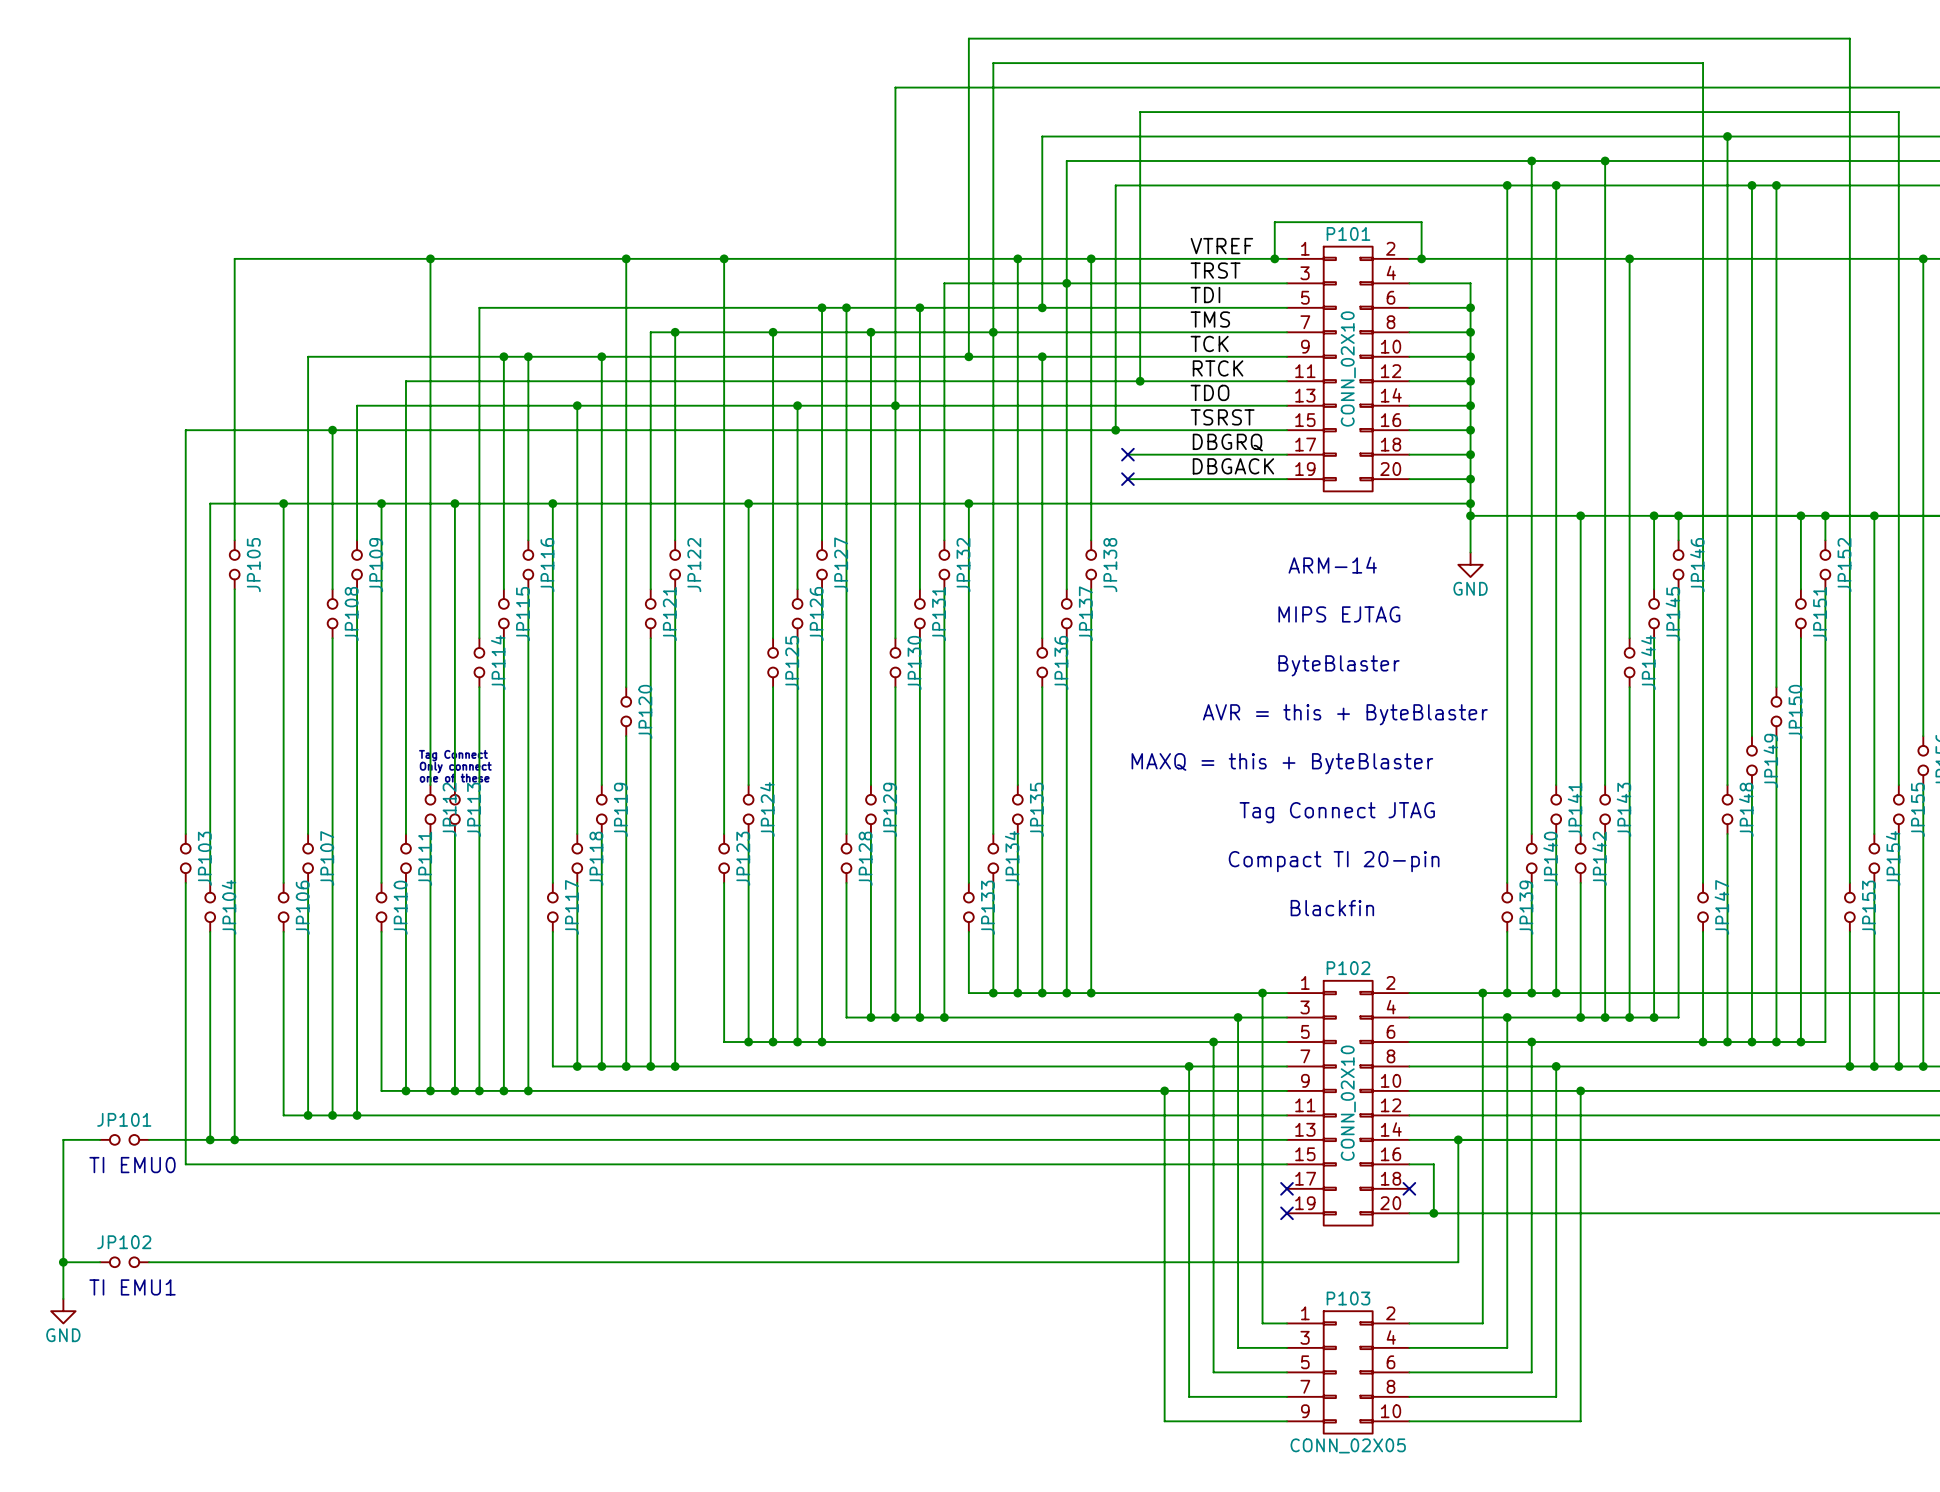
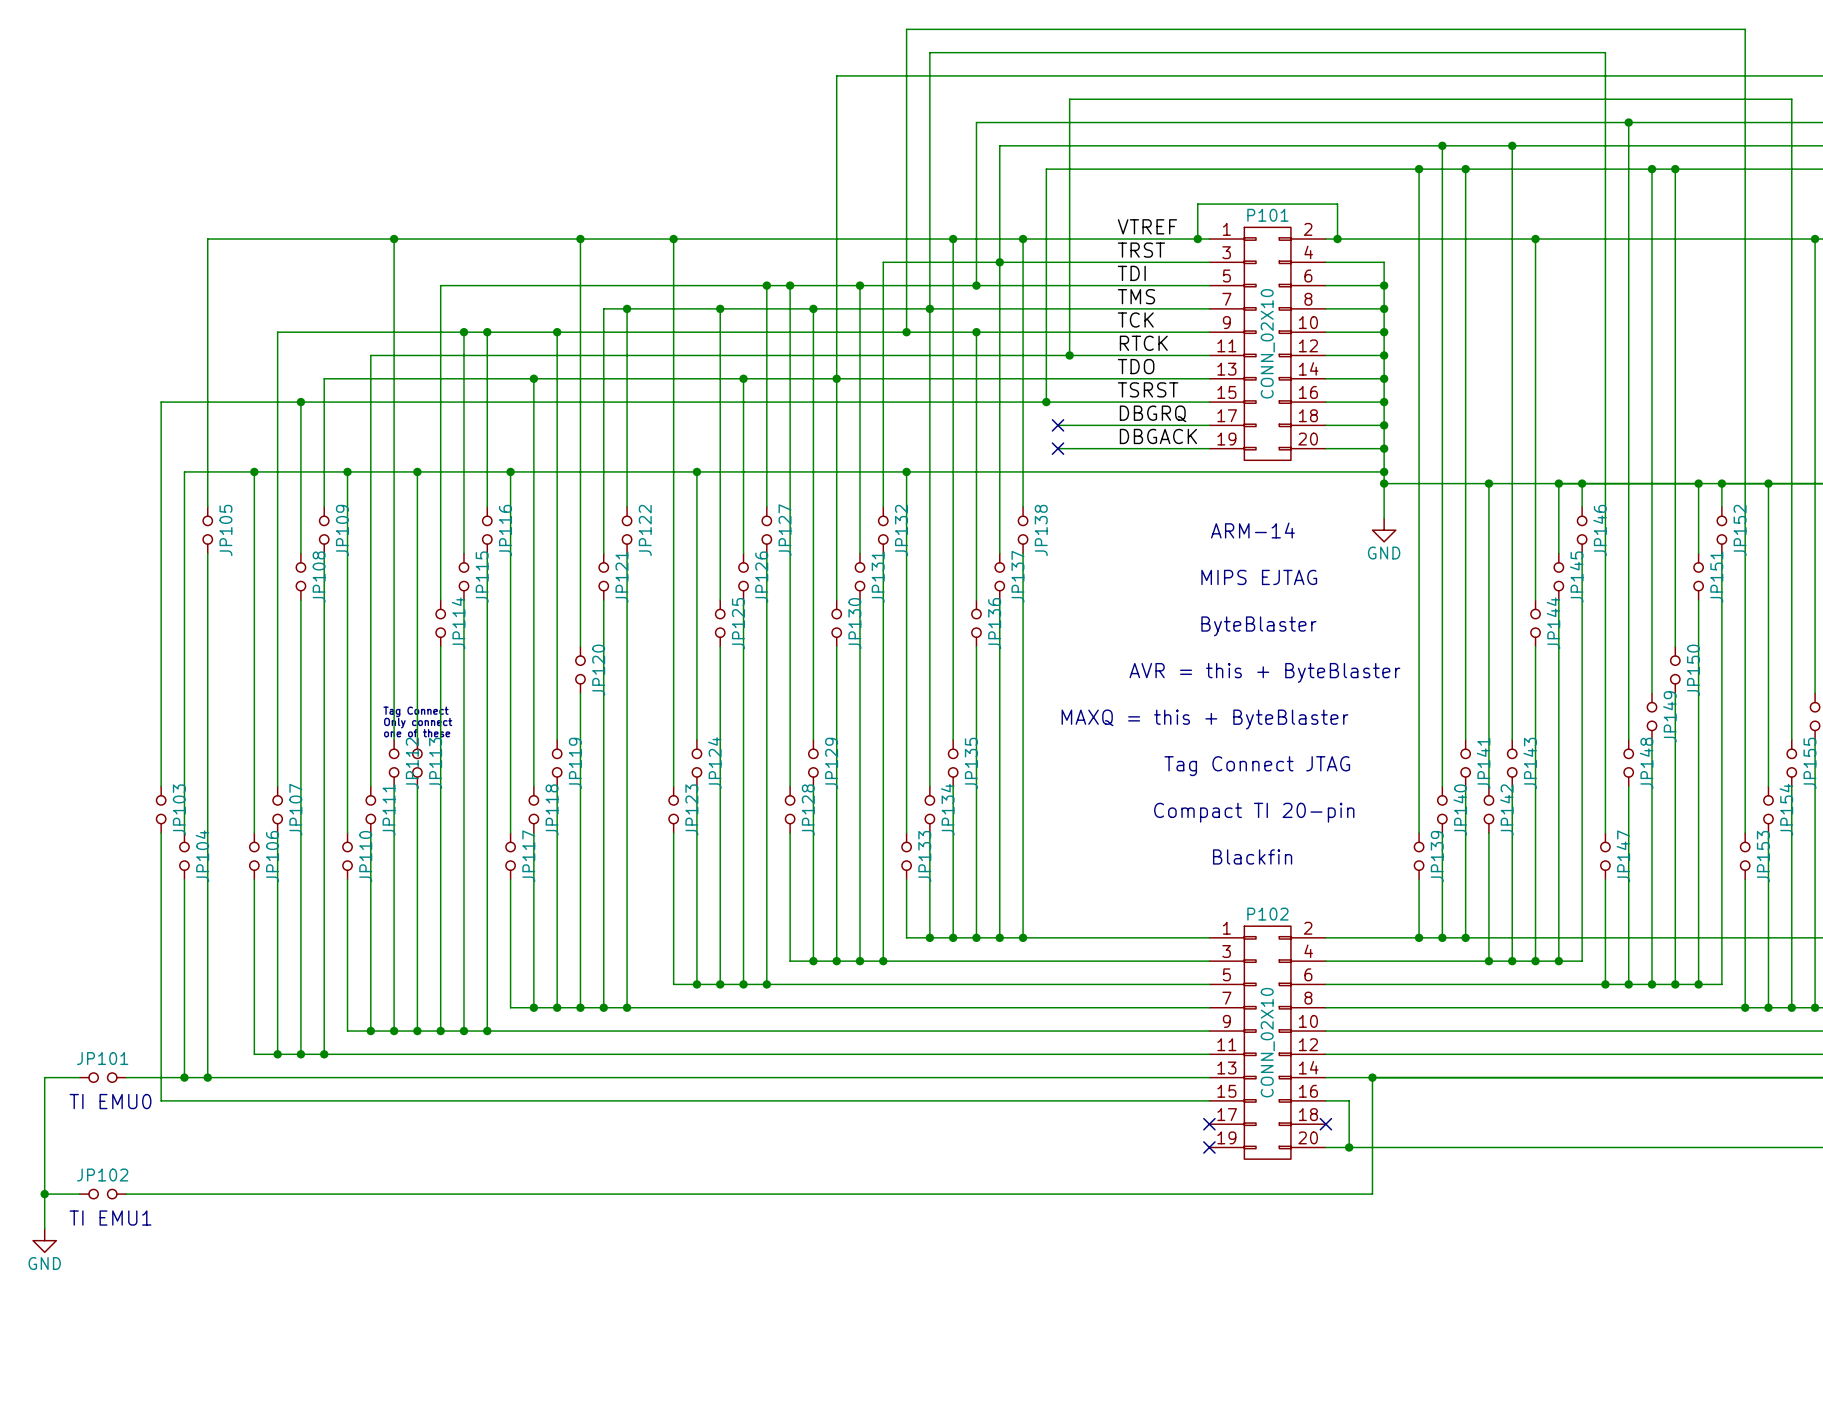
wire: (1262, 993) (1262, 1323) (1287, 1323) -> none
junction: (1262, 993) -> none
wire: (1482, 993) (1482, 1323) (1409, 1323) -> none
junction: (1482, 993) -> none
wire: (1238, 1017) (1238, 1347) (1287, 1347) -> none
junction: (1238, 1017) -> none
wire: (1507, 1017) (1507, 1347) (1409, 1347) -> none
junction: (1507, 1017) -> none
wire: (1213, 1042) (1213, 1372) (1287, 1372) -> none
junction: (1213, 1042) -> none
wire: (1531, 1042) (1531, 1372) (1409, 1372) -> none
junction: (1531, 1042) -> none
wire: (1189, 1066) (1189, 1396) (1287, 1396) -> none
junction: (1189, 1066) -> none
wire: (1556, 1066) (1556, 1396) (1409, 1396) -> none
junction: (1556, 1066) -> none
wire: (1164, 1090) (1164, 1421) (1287, 1421) -> none
junction: (1164, 1090) -> none
wire: (1580, 1090) (1580, 1421) (1409, 1421) -> none
junction: (1580, 1090) -> none
P103: CONN_02X05 (1348, 1372) -> none

